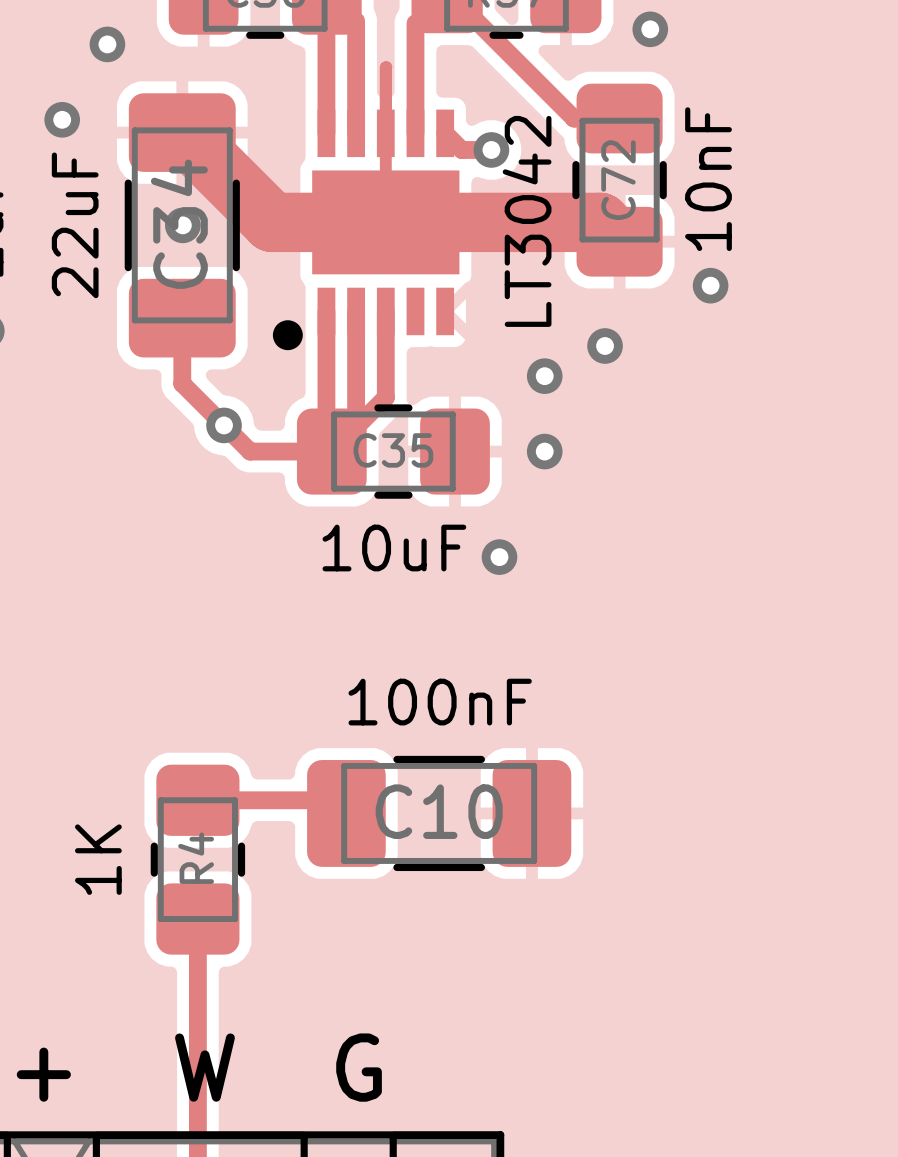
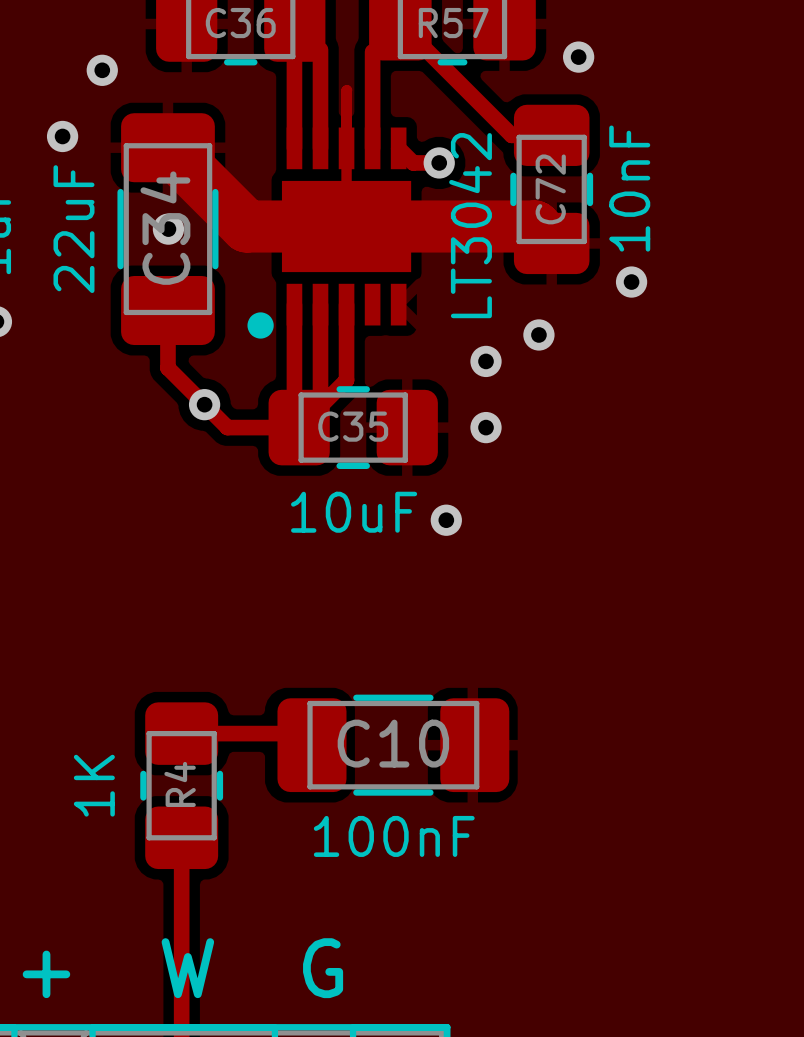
C10 value position: 100nF (440, 702) -> 100nF (394, 836)

